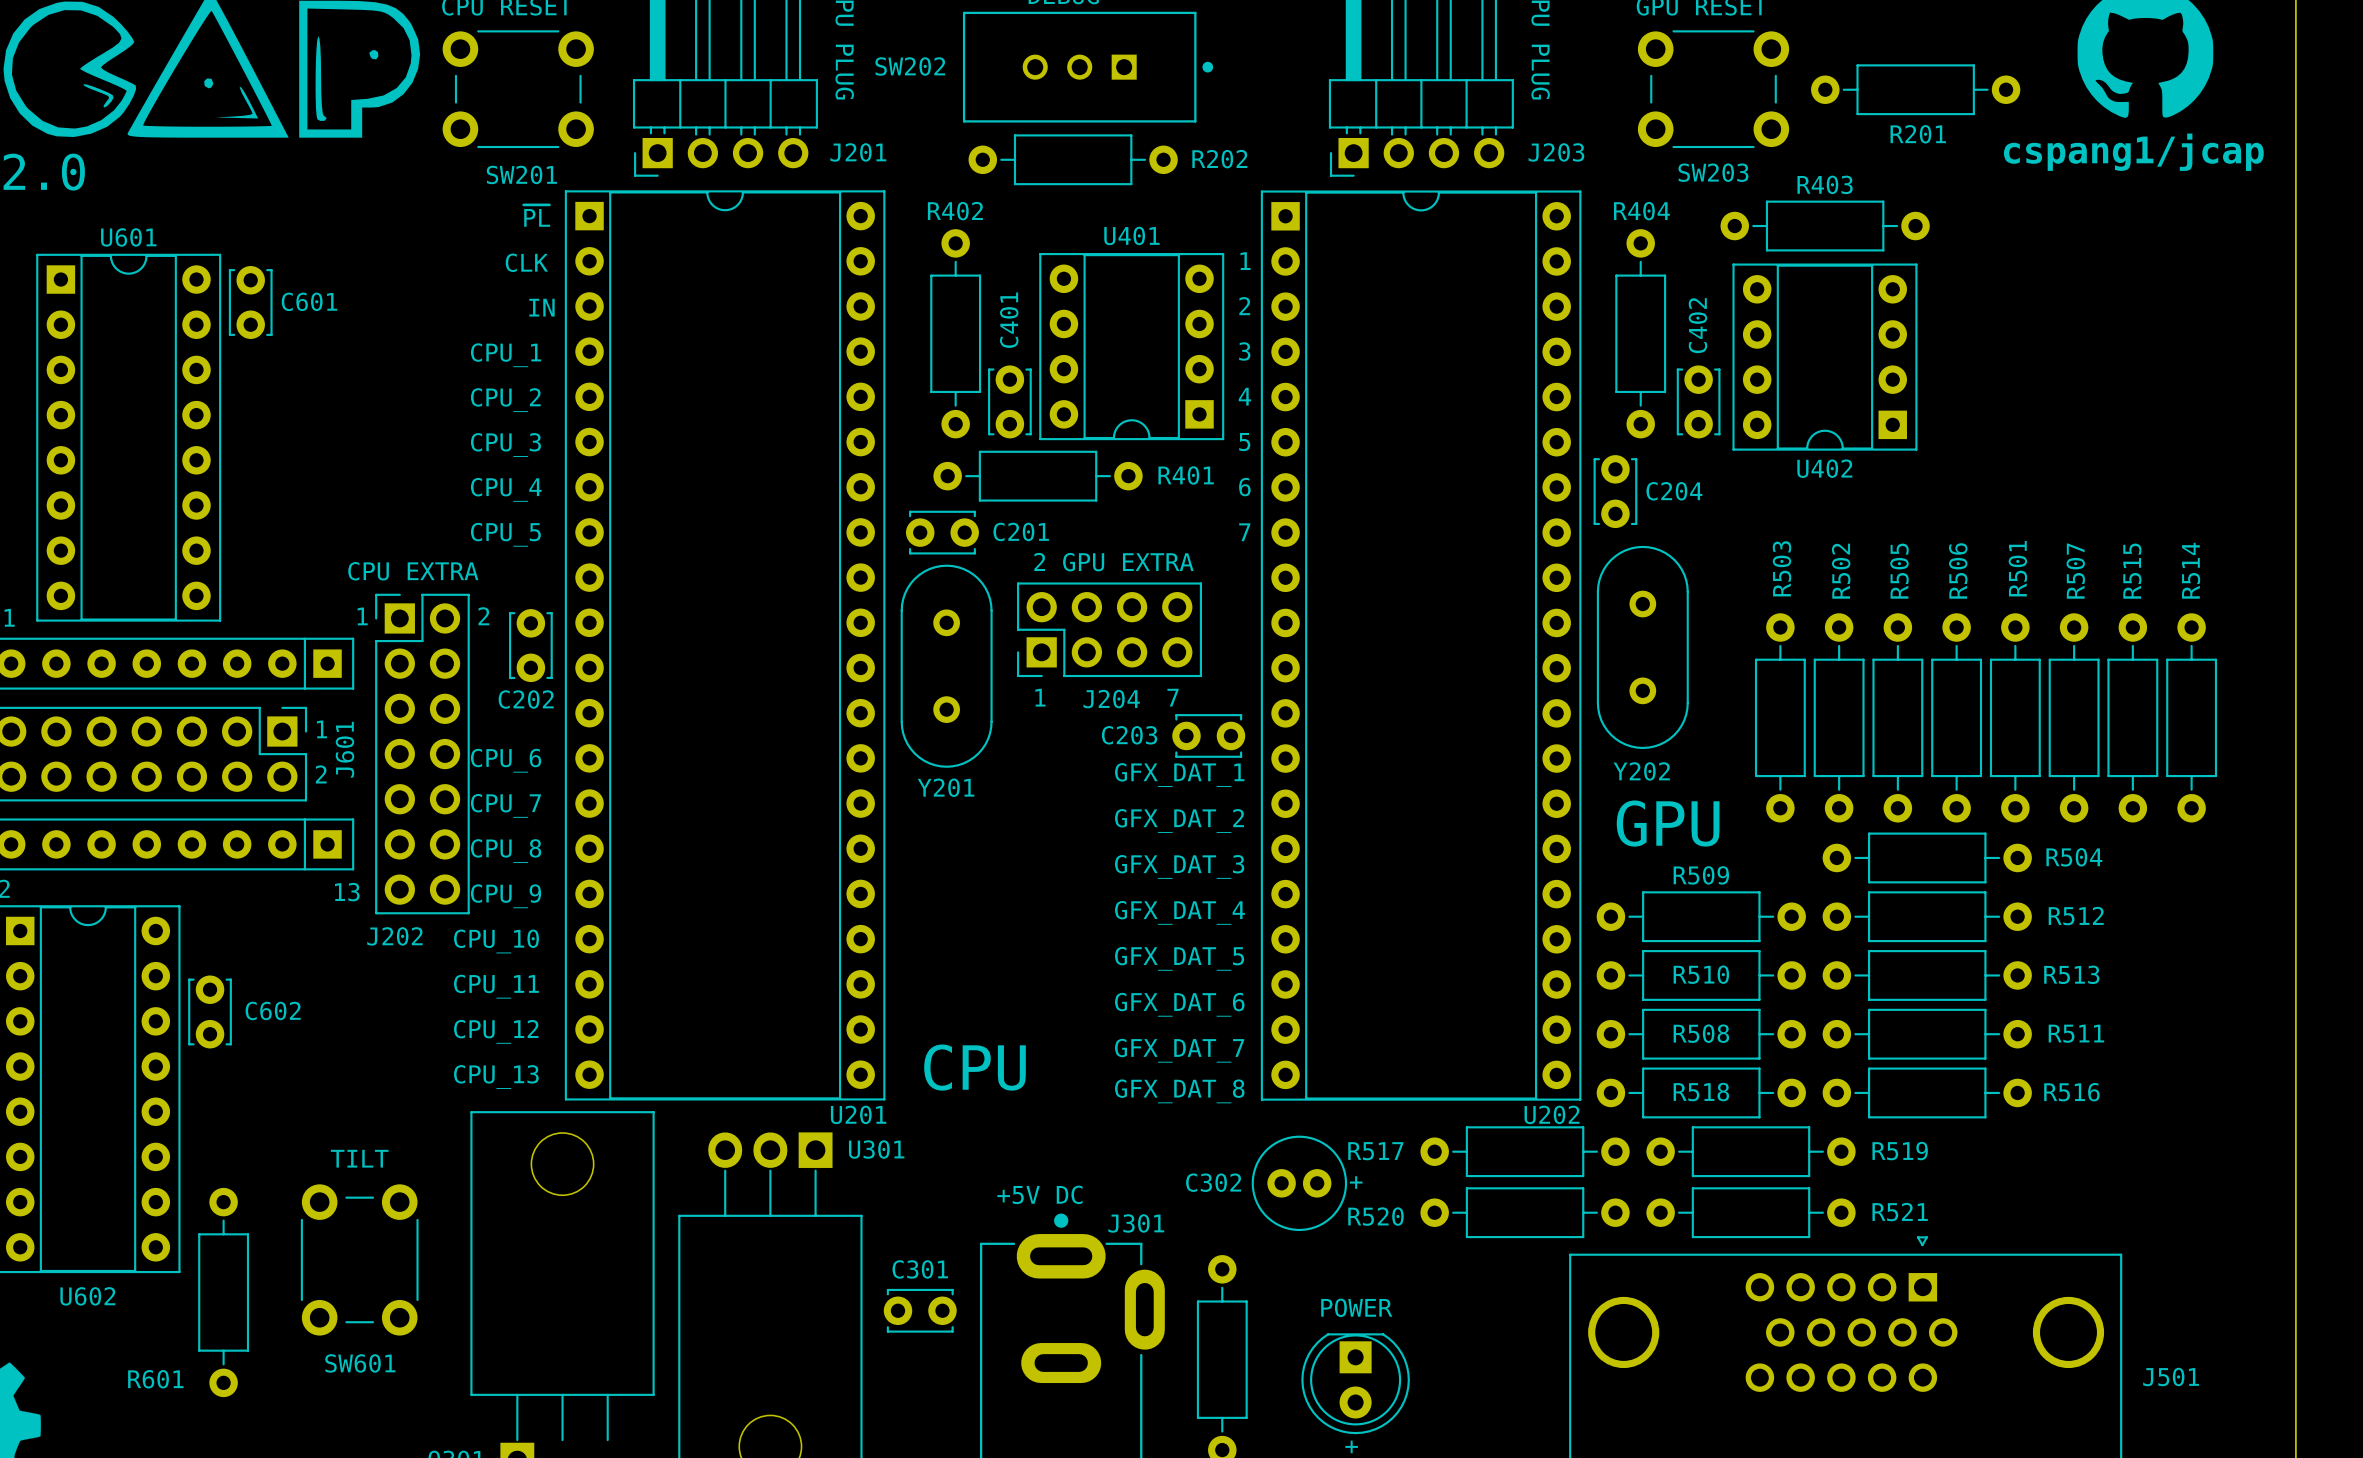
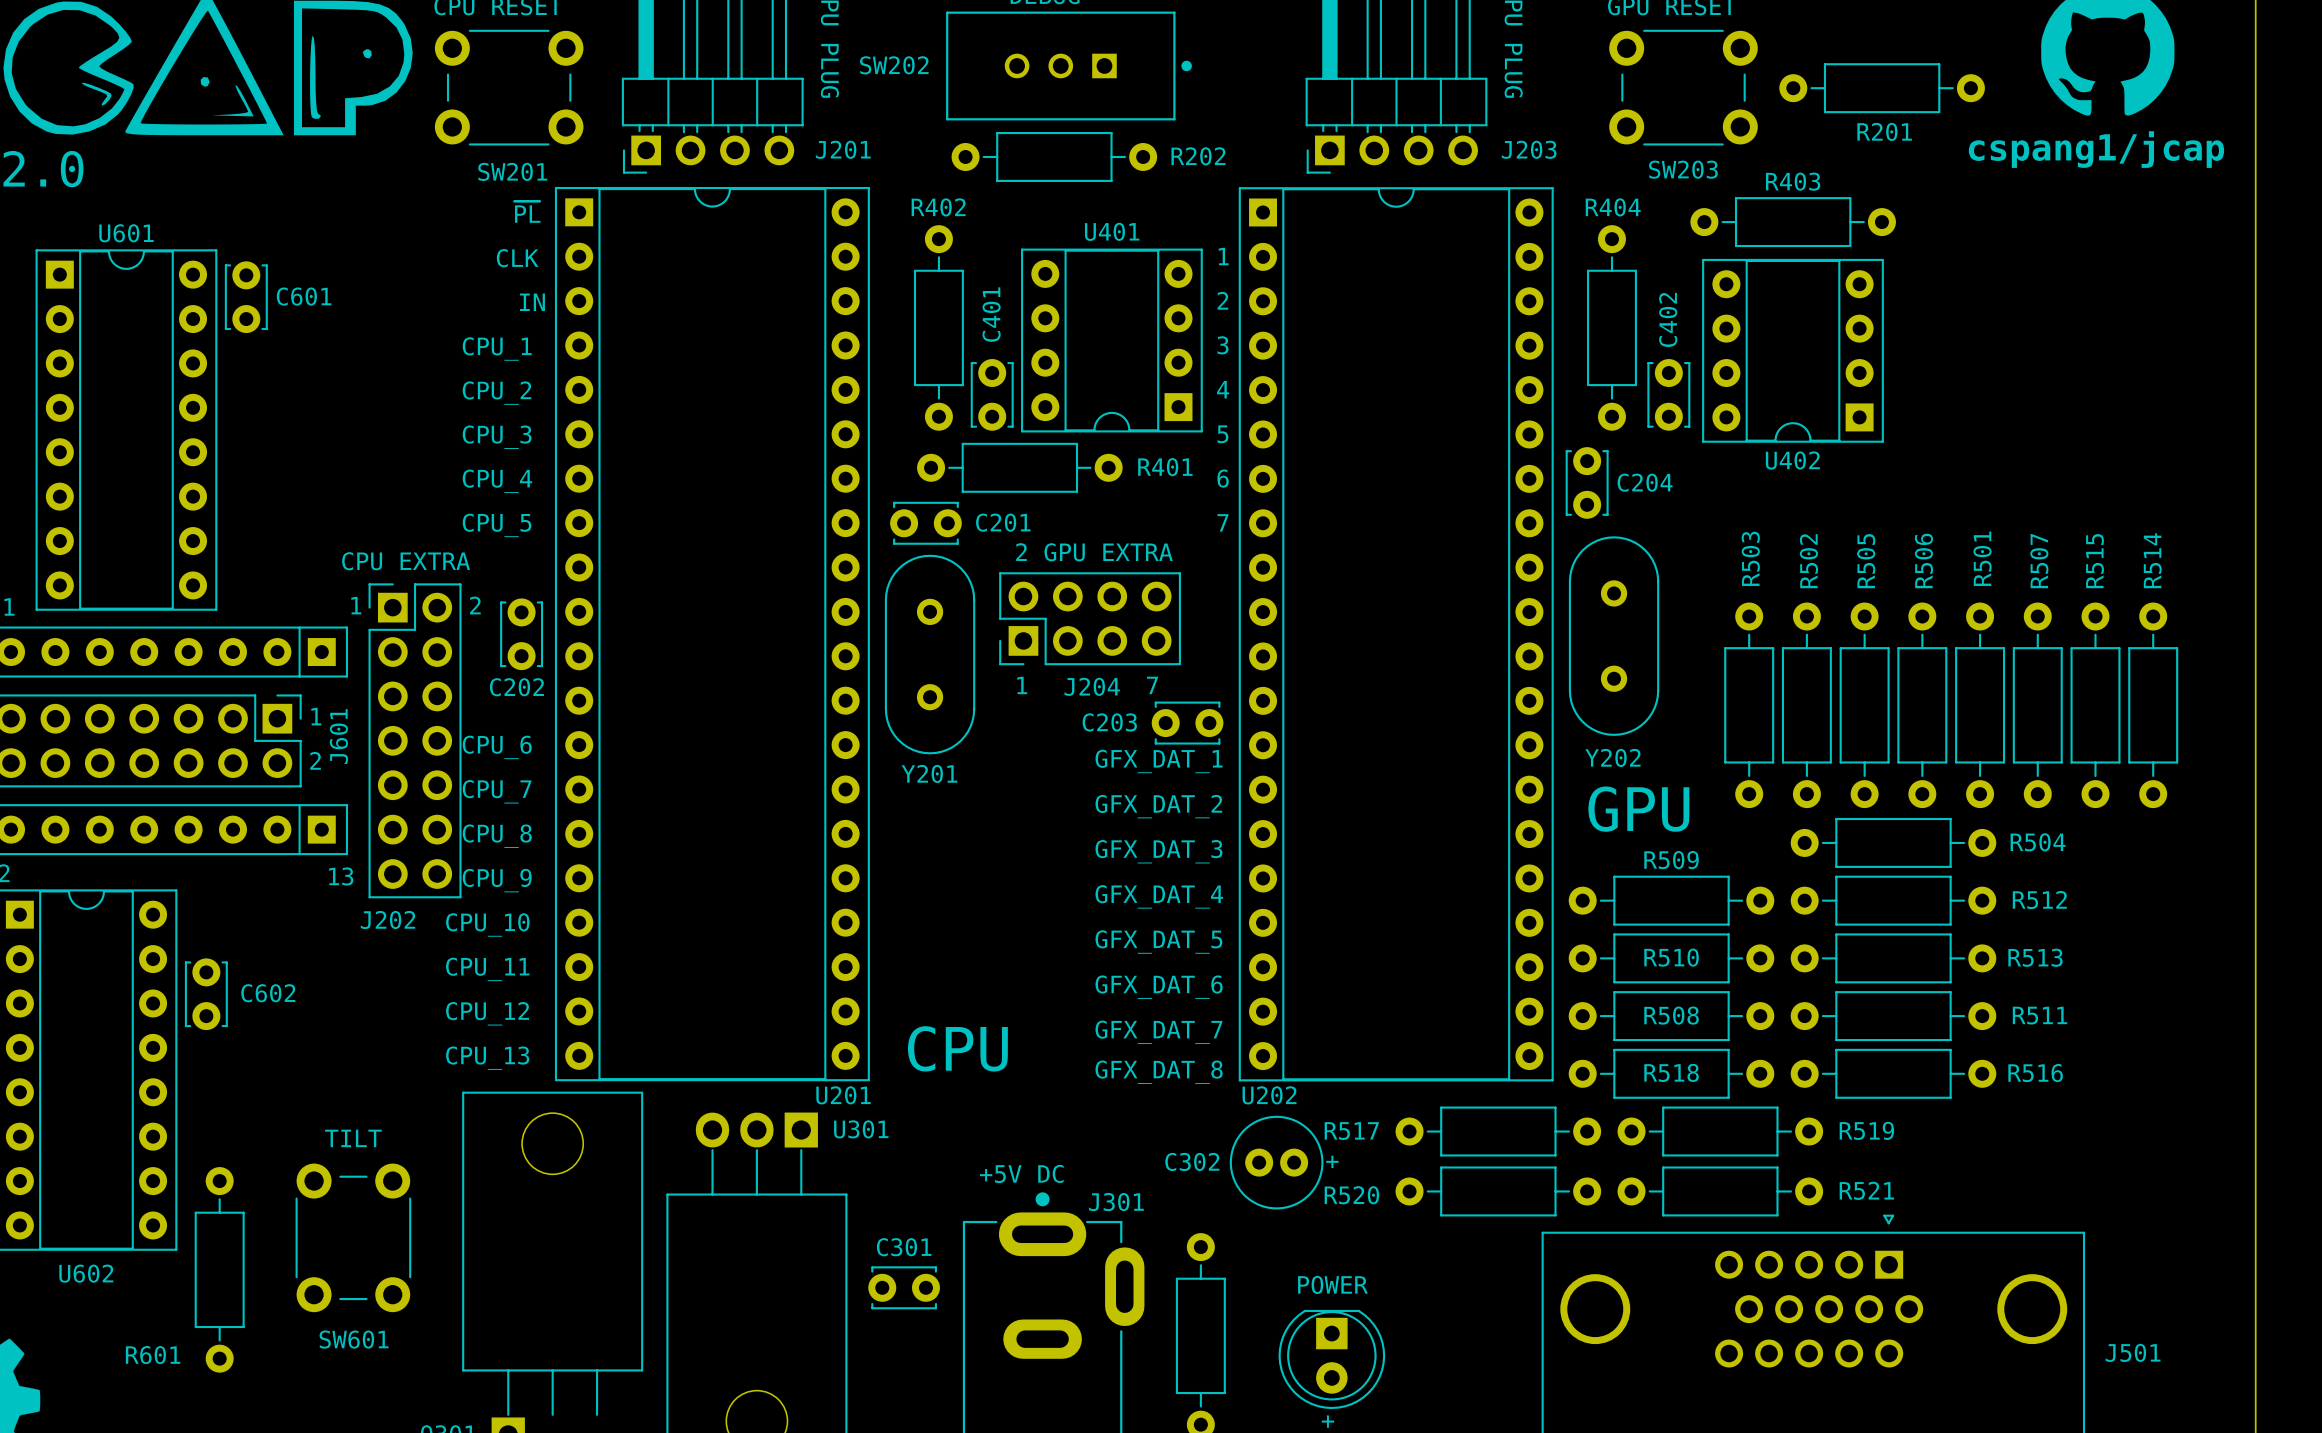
U202 name position: U202 (1552, 1114) -> U202 (1269, 1095)

